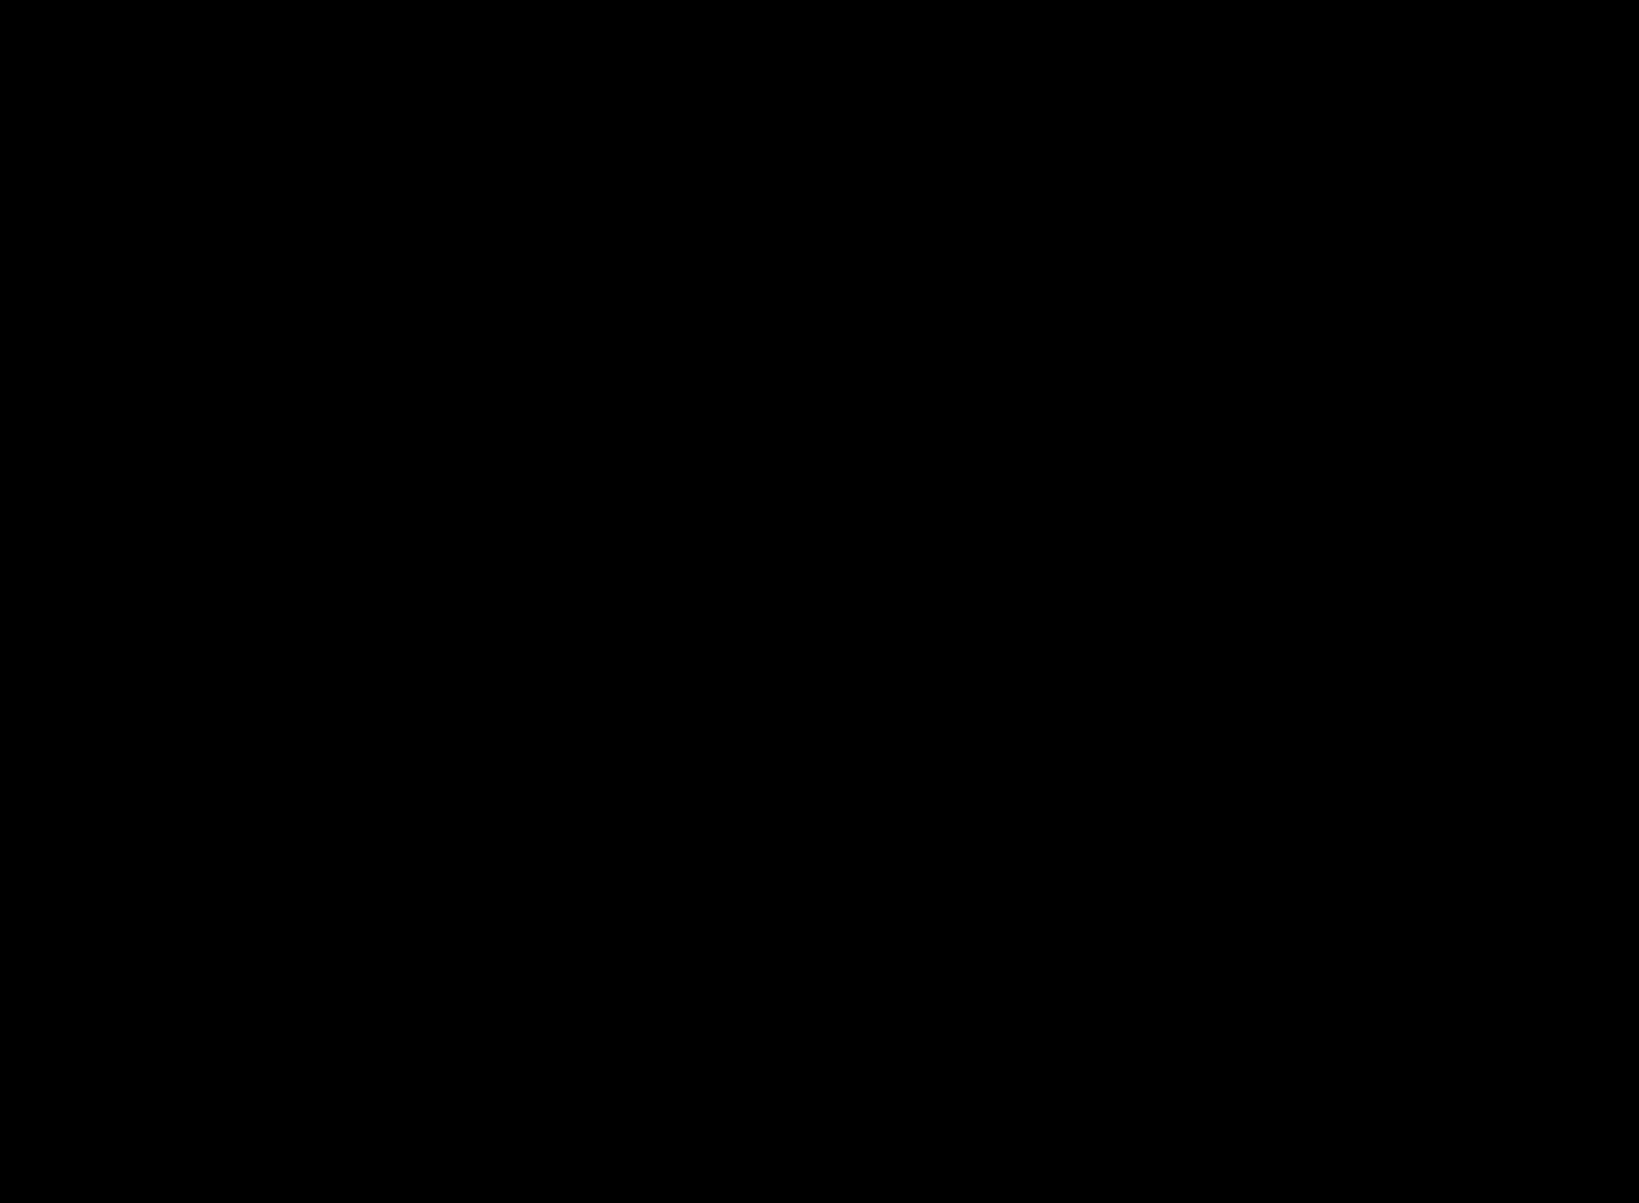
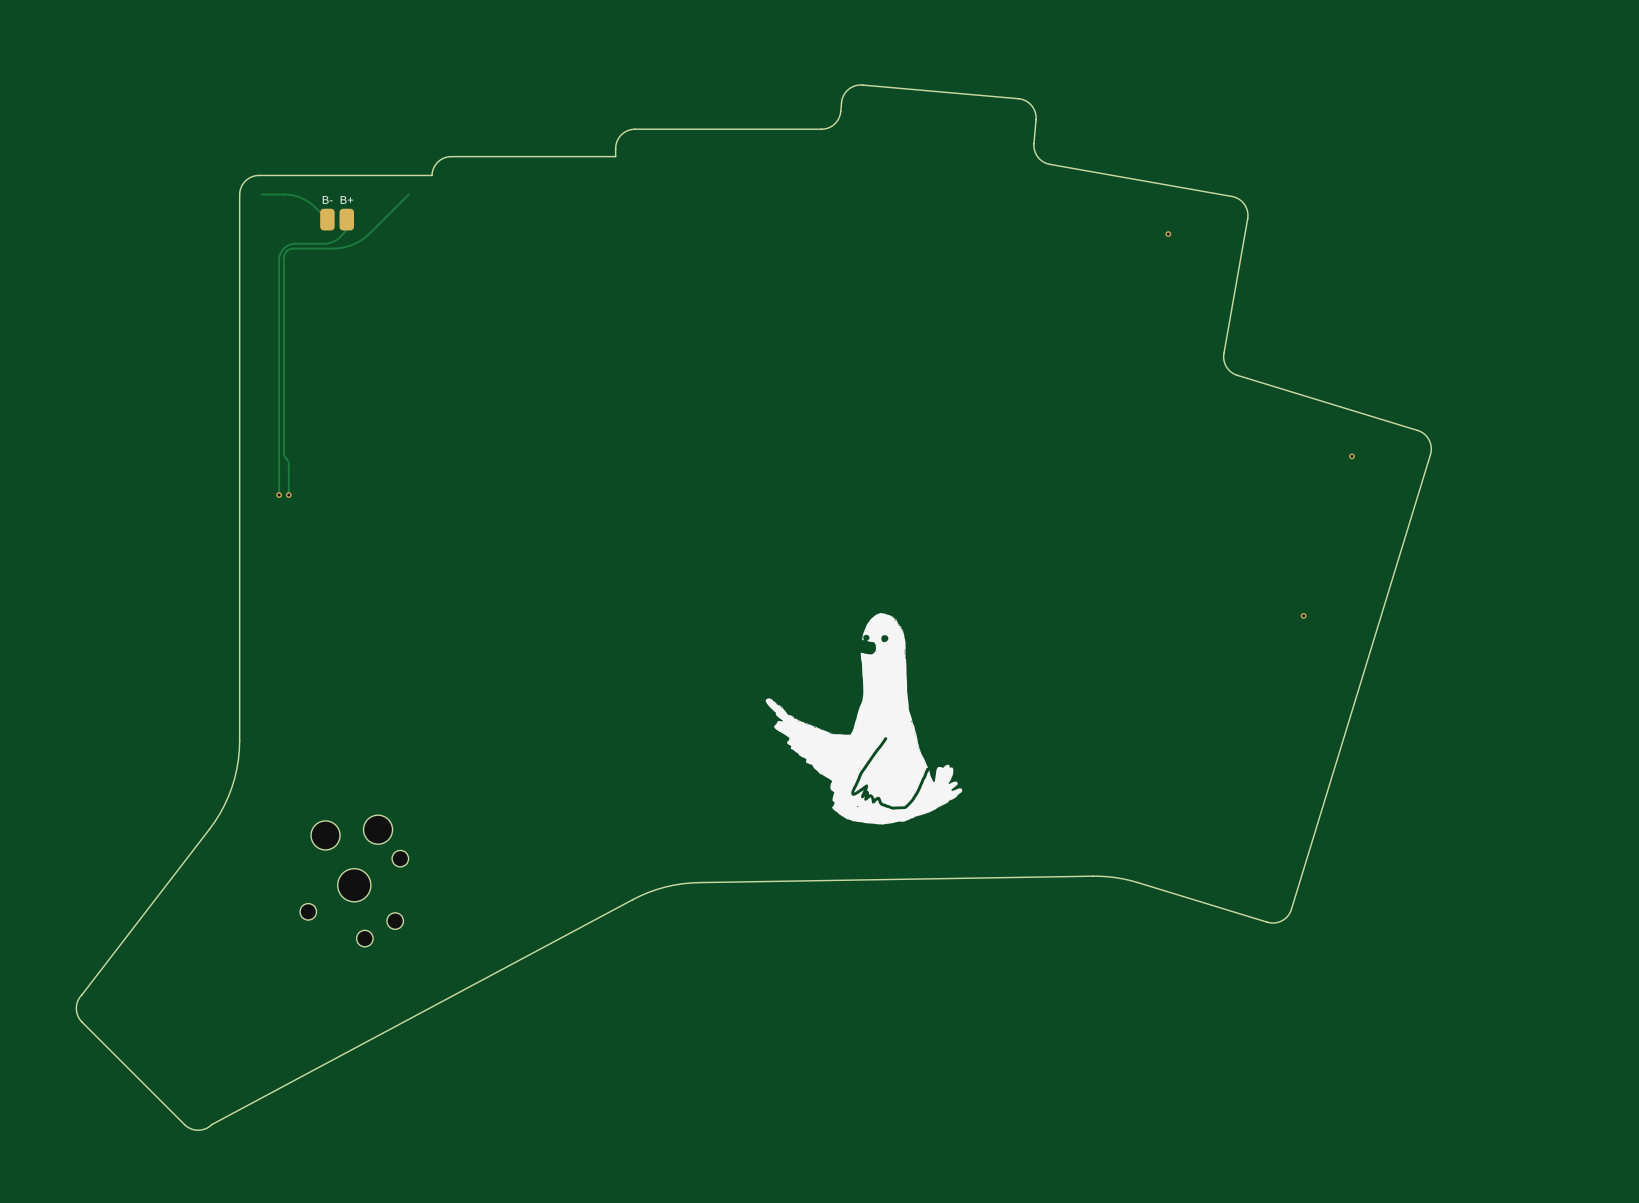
board edge: none -> (862, 85) (1023, 99) (1029, 103) (1035, 112) (1034, 148) (1037, 157) (1045, 162) (1238, 198) (1245, 206) (1247, 216) (1223, 353) (1224, 362) (1227, 368) (1237, 375) (1417, 430) (1429, 439) (1430, 454) (1289, 913) (1280, 921) (1269, 922) (1130, 880) (1100, 876) (698, 882) (673, 885) (648, 892) (632, 899) (206, 1128) (198, 1130) (187, 1127) (82, 1022) (77, 1014) (76, 1006) (80, 996) (215, 821) (228, 796) (236, 769) (239, 740) (239, 194) (242, 185) (249, 178) (258, 175) (432, 175) (436, 163) (448, 156) (615, 156) (618, 138) (623, 133) (632, 129) (823, 129) (832, 125) (837, 120) (842, 98) (846, 90) (853, 86) (862, 85)
track: none -> (261, 194) (288, 194) (300, 197) (311, 204) (327, 219)
track: none -> (408, 194) (370, 233) (357, 242) (338, 248) (291, 248) (284, 254) (283, 452) (288, 463) (288, 495)
part: none -> (337, 219)
track: none -> (346, 219) (345, 231) (335, 240) (327, 243) (290, 244) (283, 248) (279, 255) (279, 495)
via: none -> (1168, 234)
via: none -> (1351, 456)
via: none -> (279, 495)
via: none -> (288, 495)
drawing: none -> [765, 613, 963, 825]
via: none -> (1303, 615)
part: none -> (354, 880)

